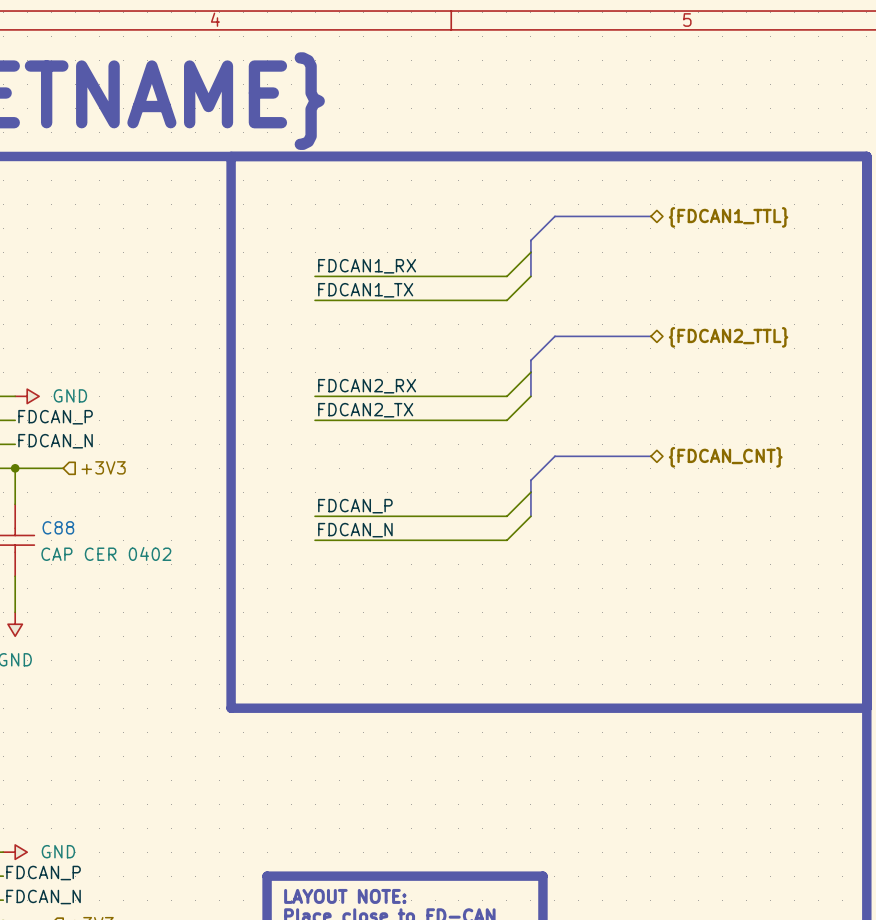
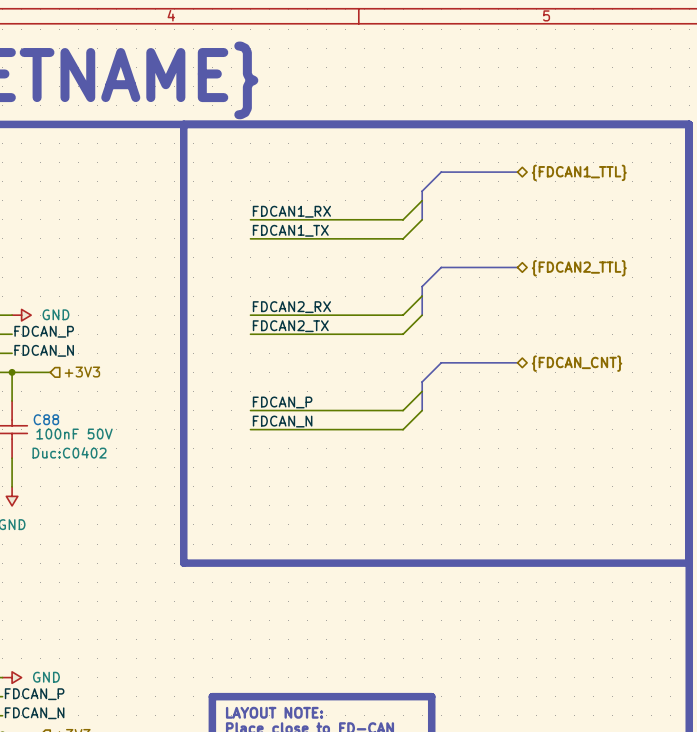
C88 value: CAP CER 0402 (106, 553) -> 100nF 50V (74, 434)
C88 text: none -> Duc:C0402 (69, 452)

